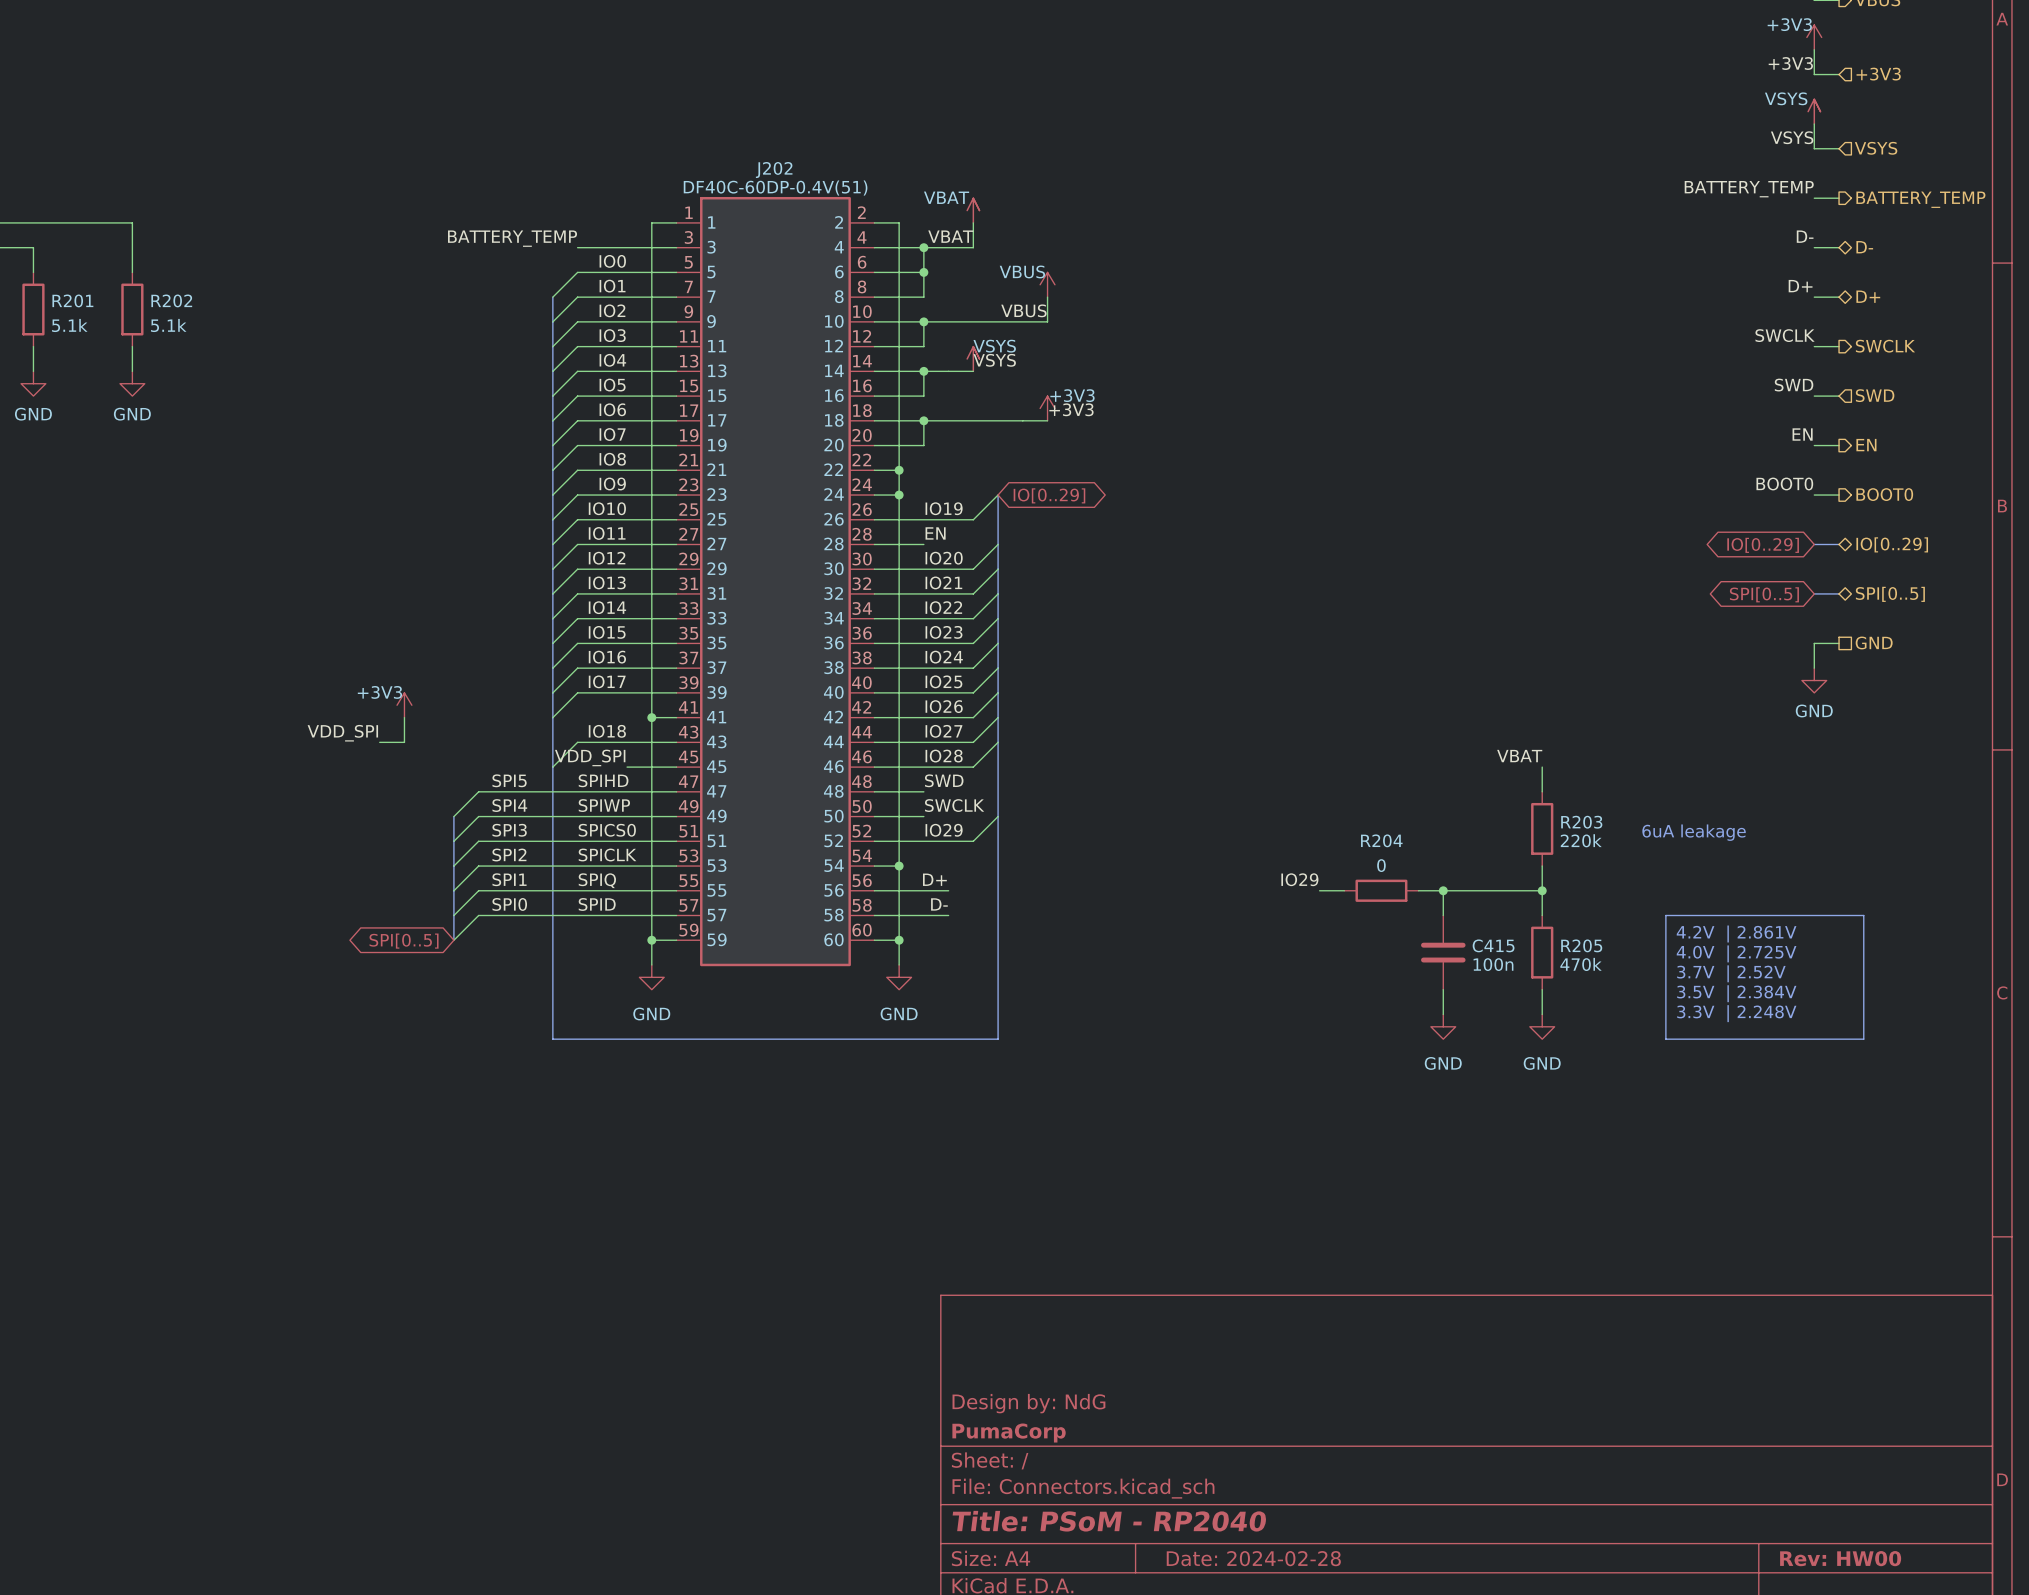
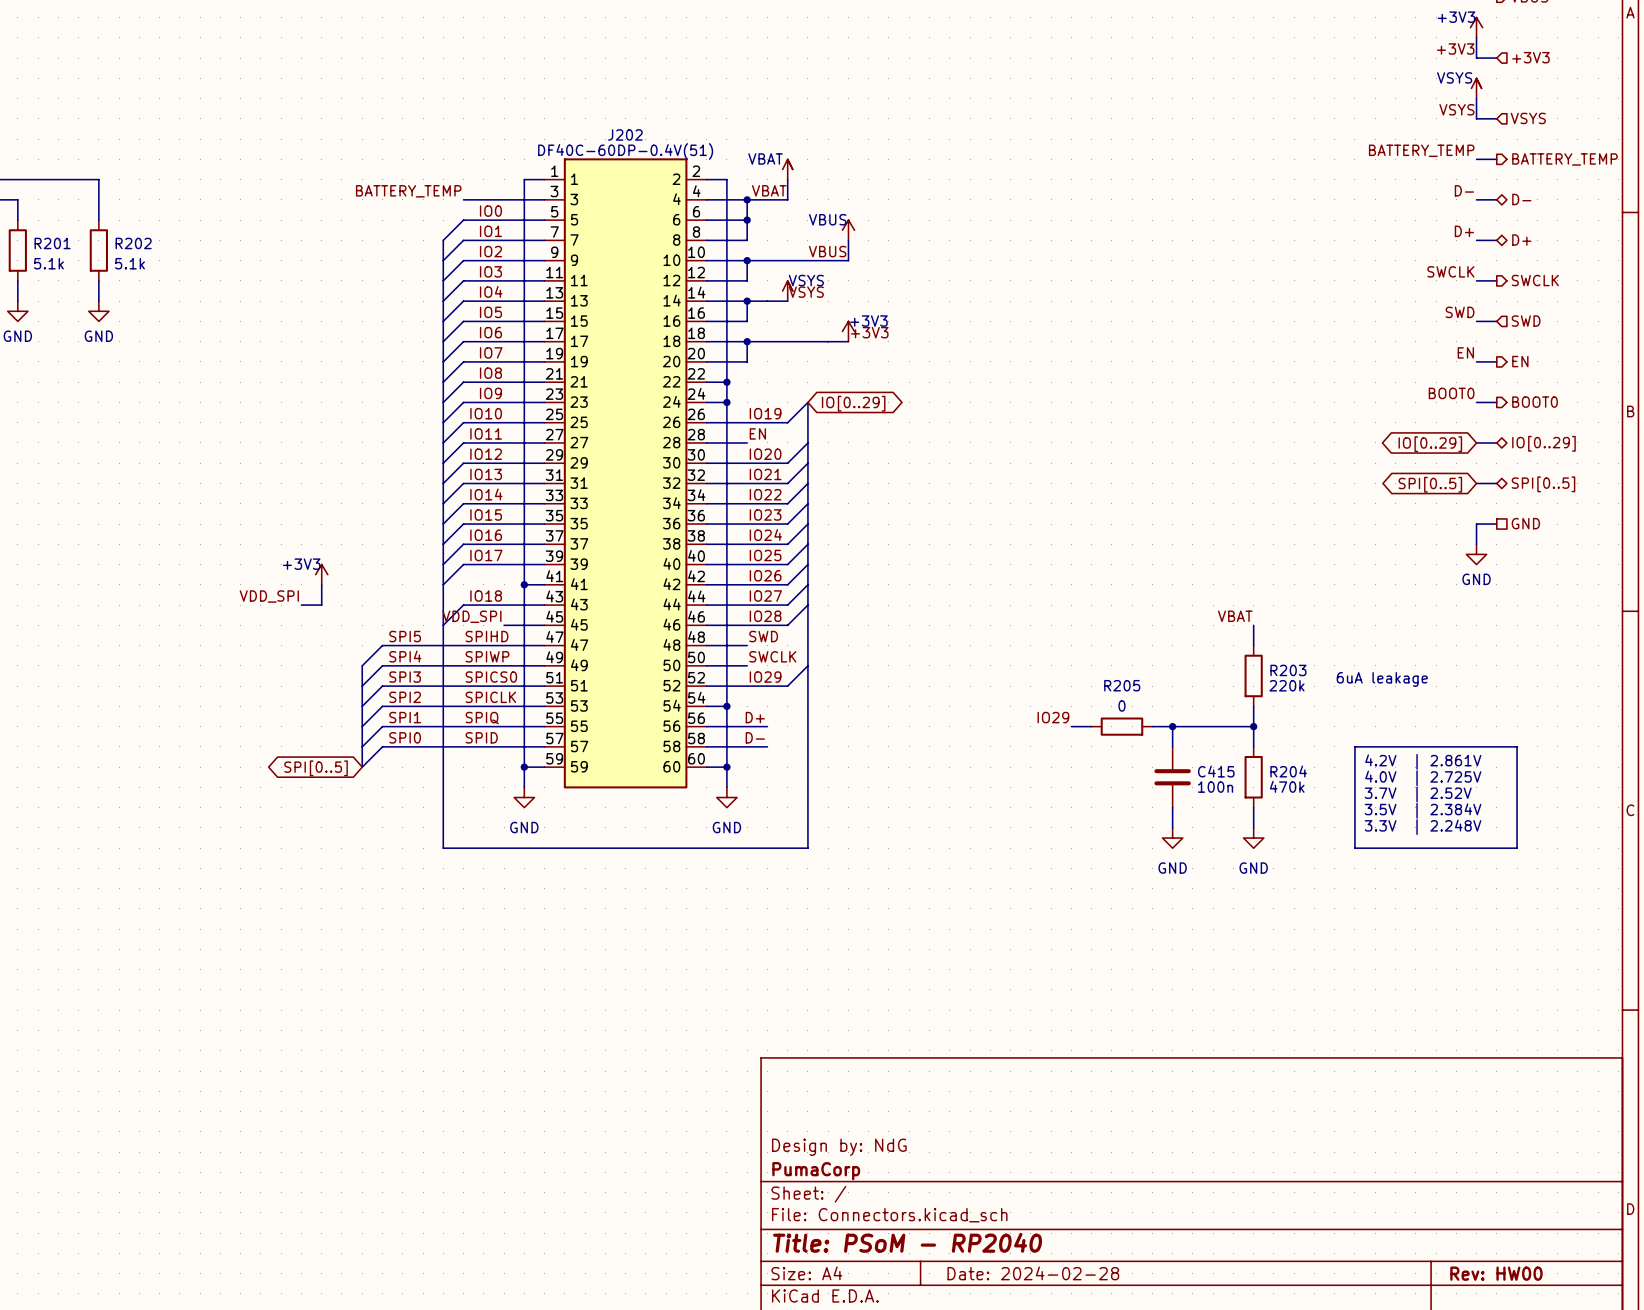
R204 name: R204 (1381, 840) -> R205 (1122, 685)
R205 name: R205 (1581, 945) -> R204 (1288, 771)

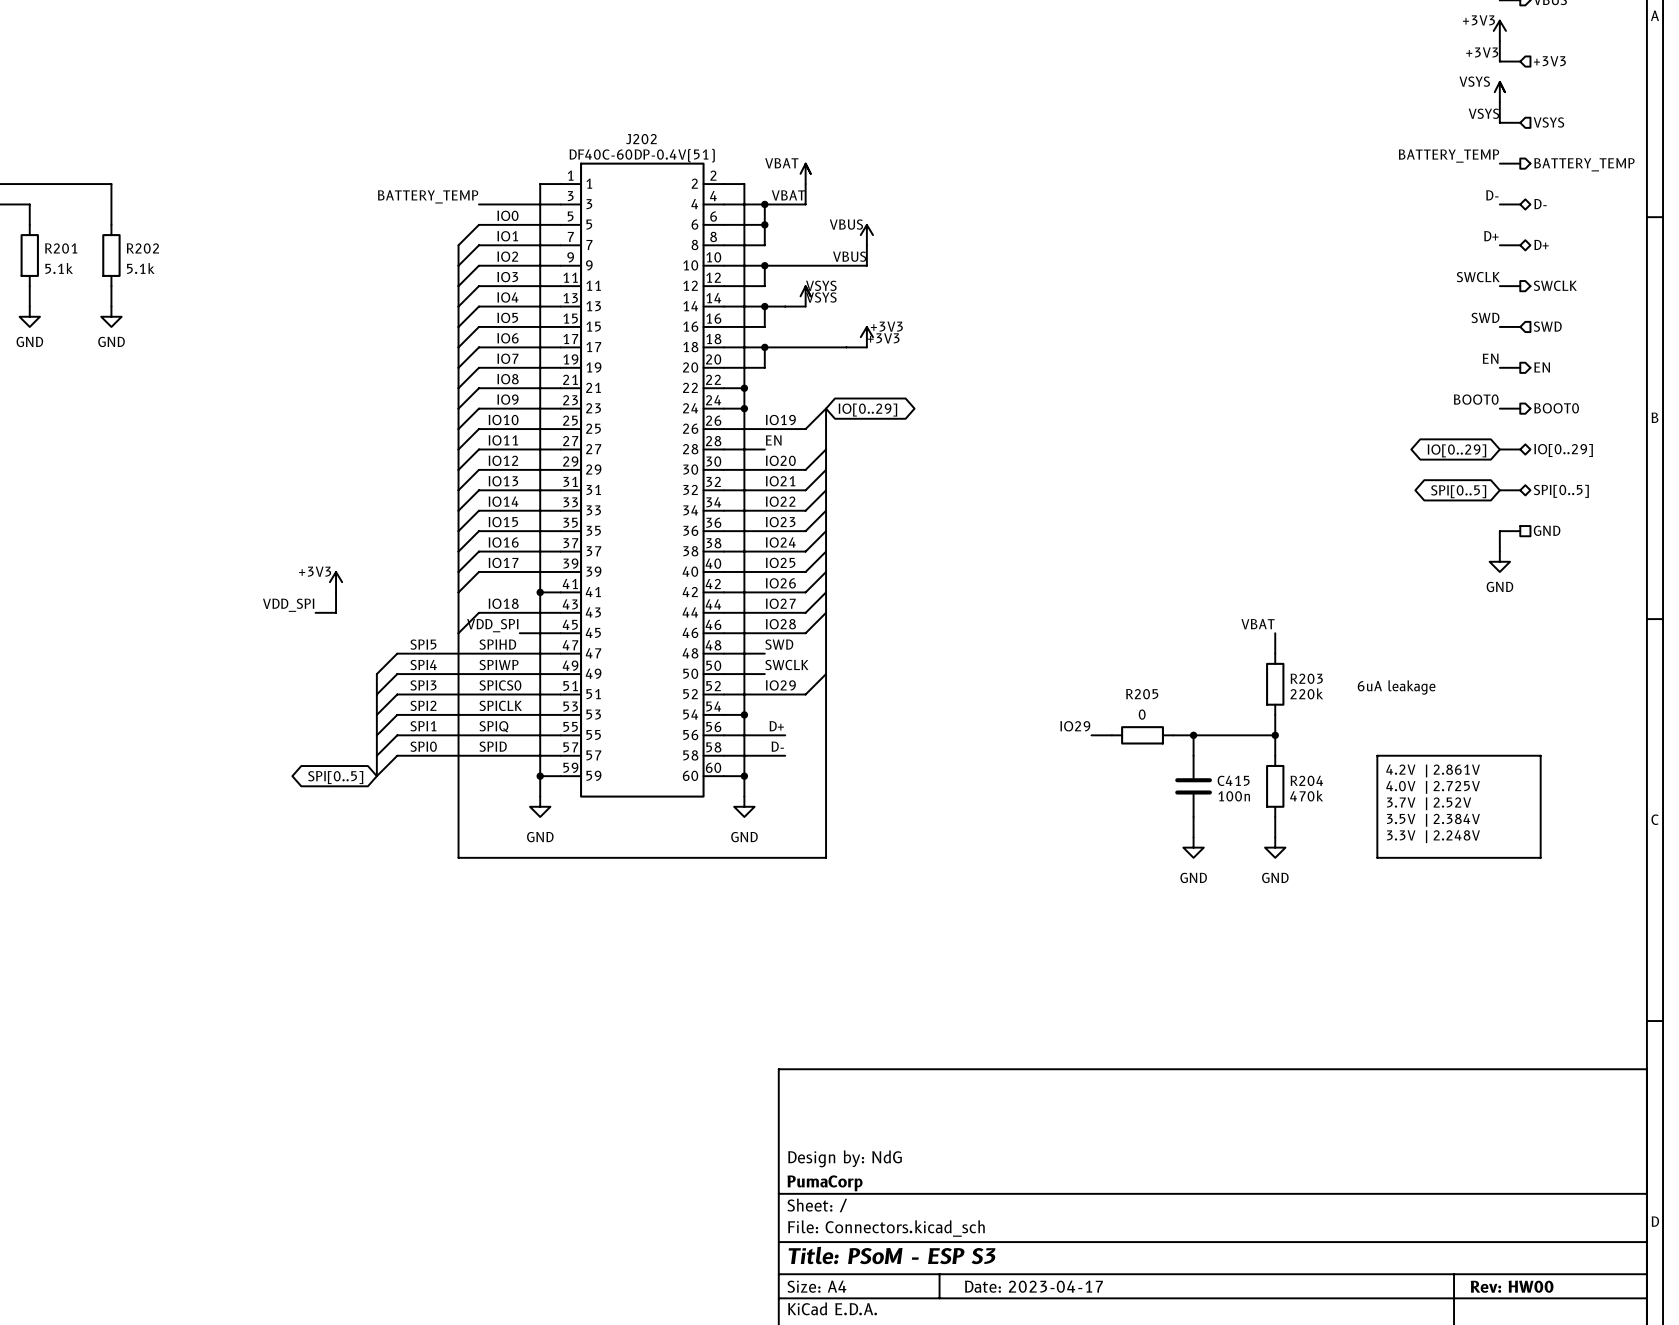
title block: Title: PSoM - RP2040 (907, 1242) -> Title: PSoM - ESP S3 (892, 1255)
title block: Date: 2024-02-28 (1033, 1273) -> Date: 2023-04-17 (1033, 1286)

